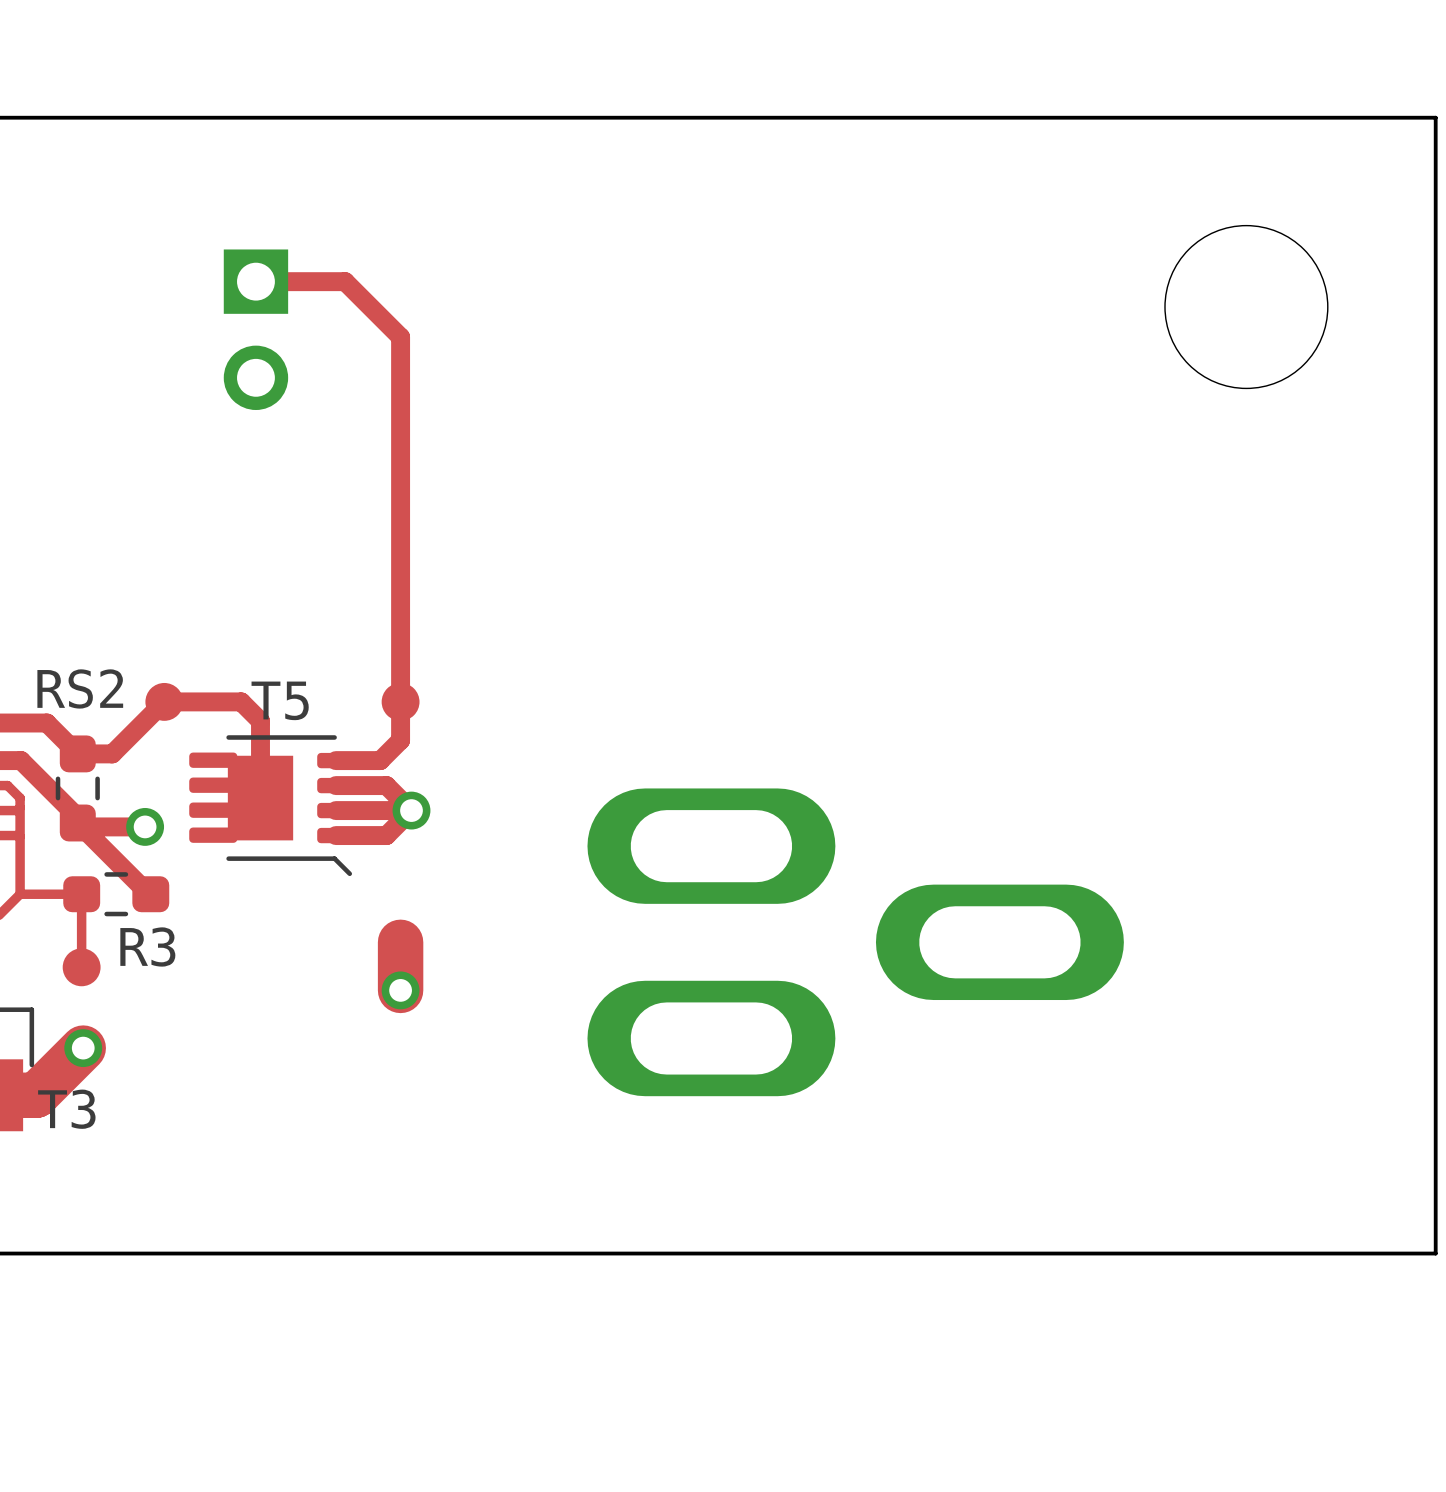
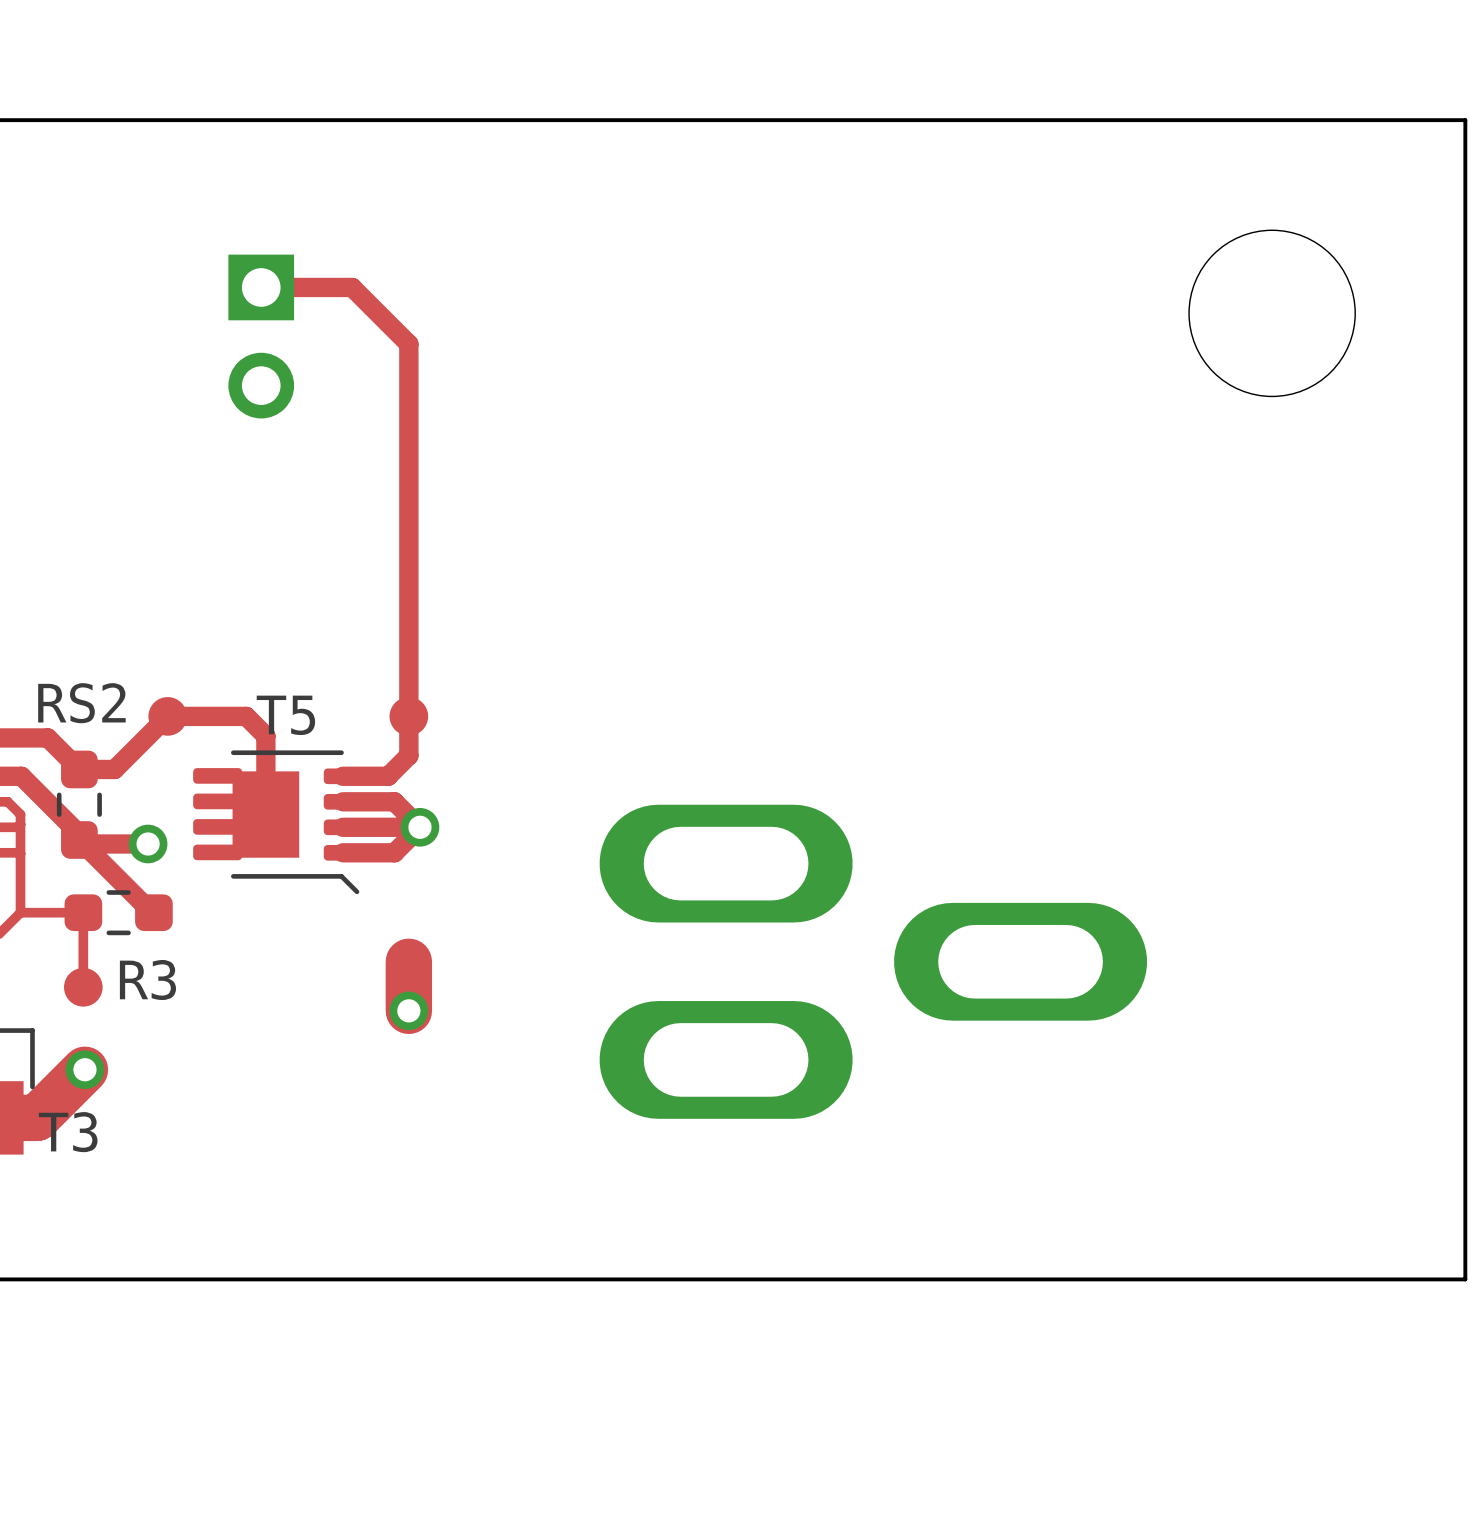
R3 name position: R3 (147, 946) -> R3 (147, 979)

